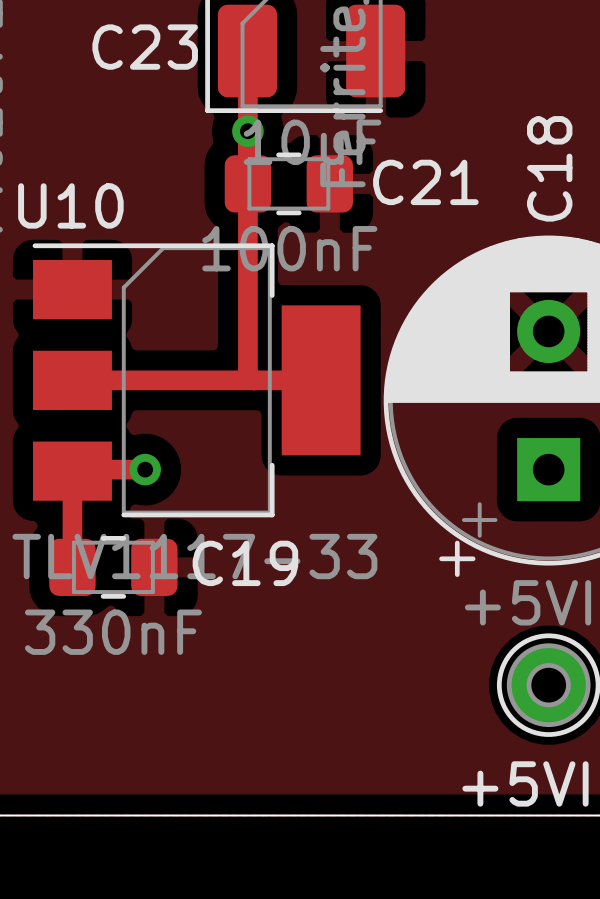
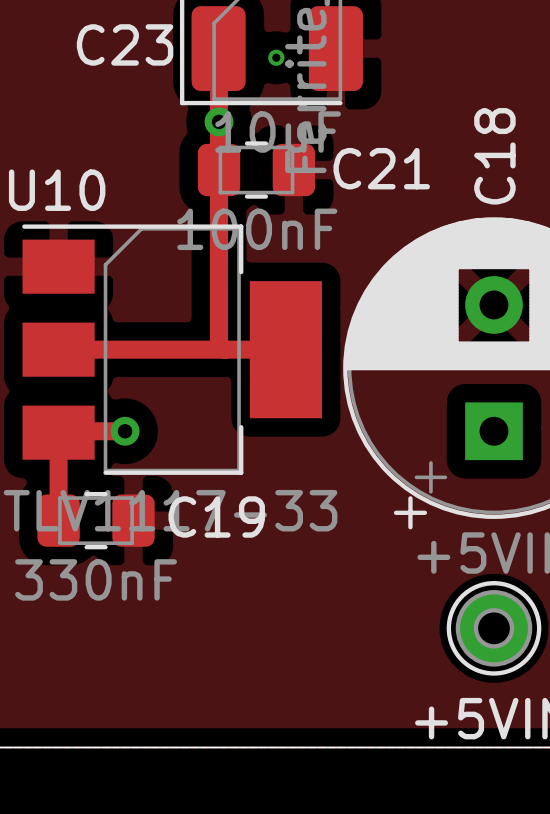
via: none -> (276, 57)

